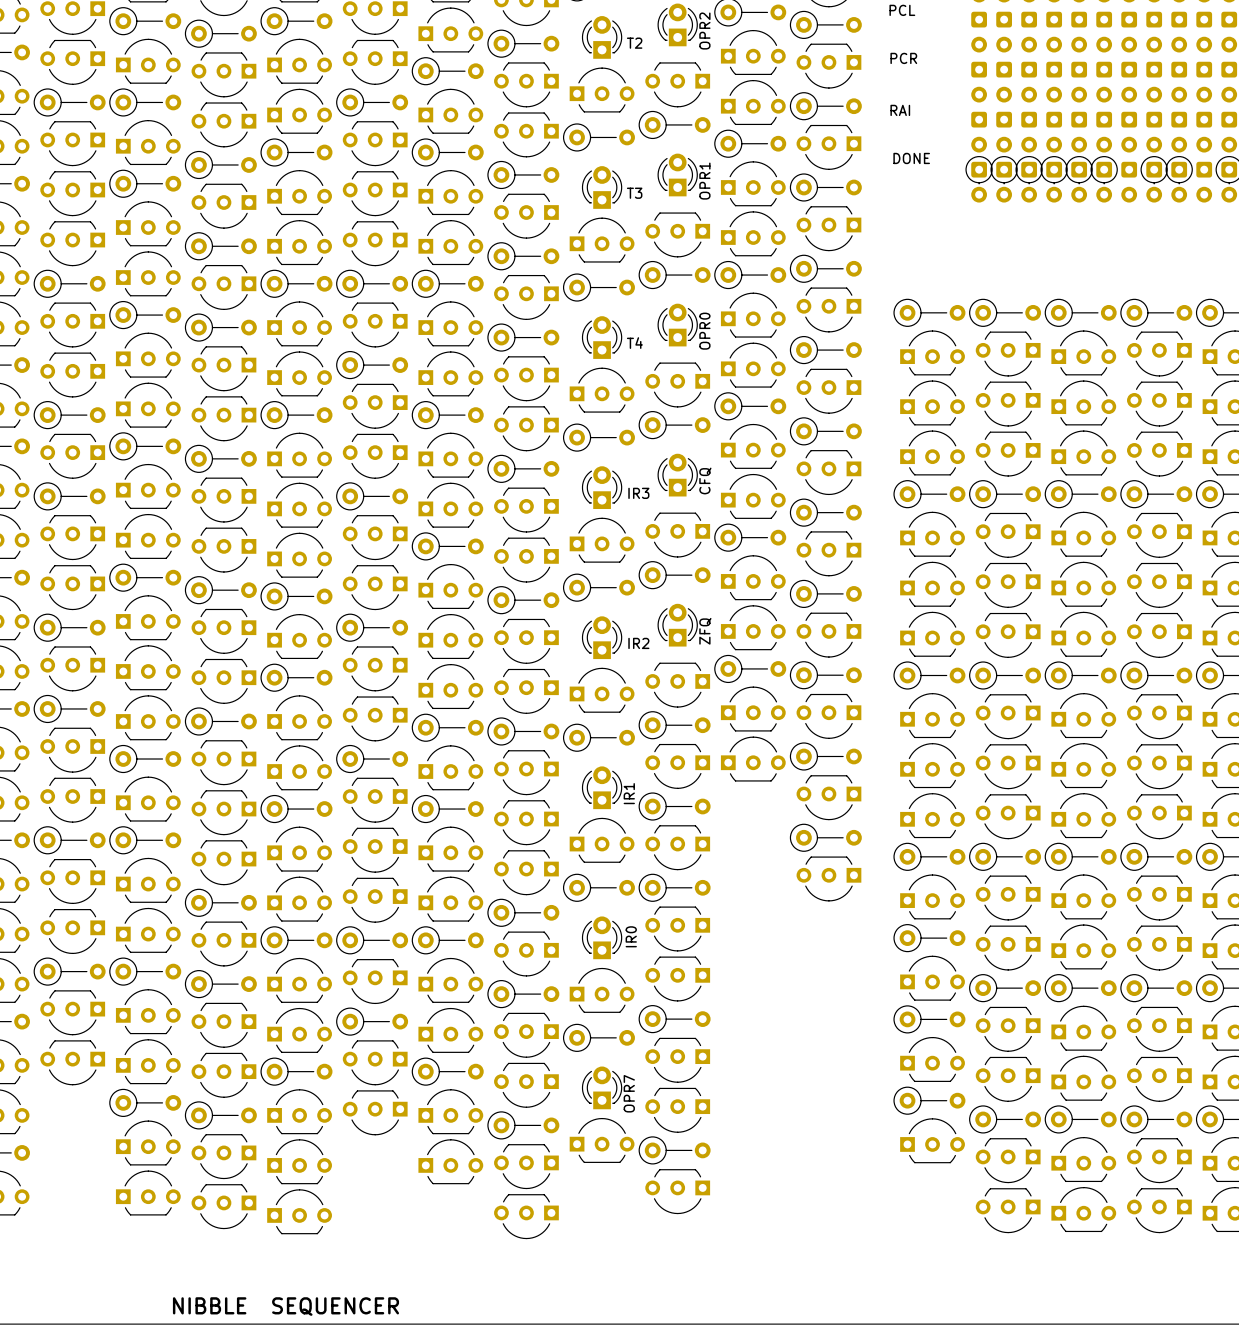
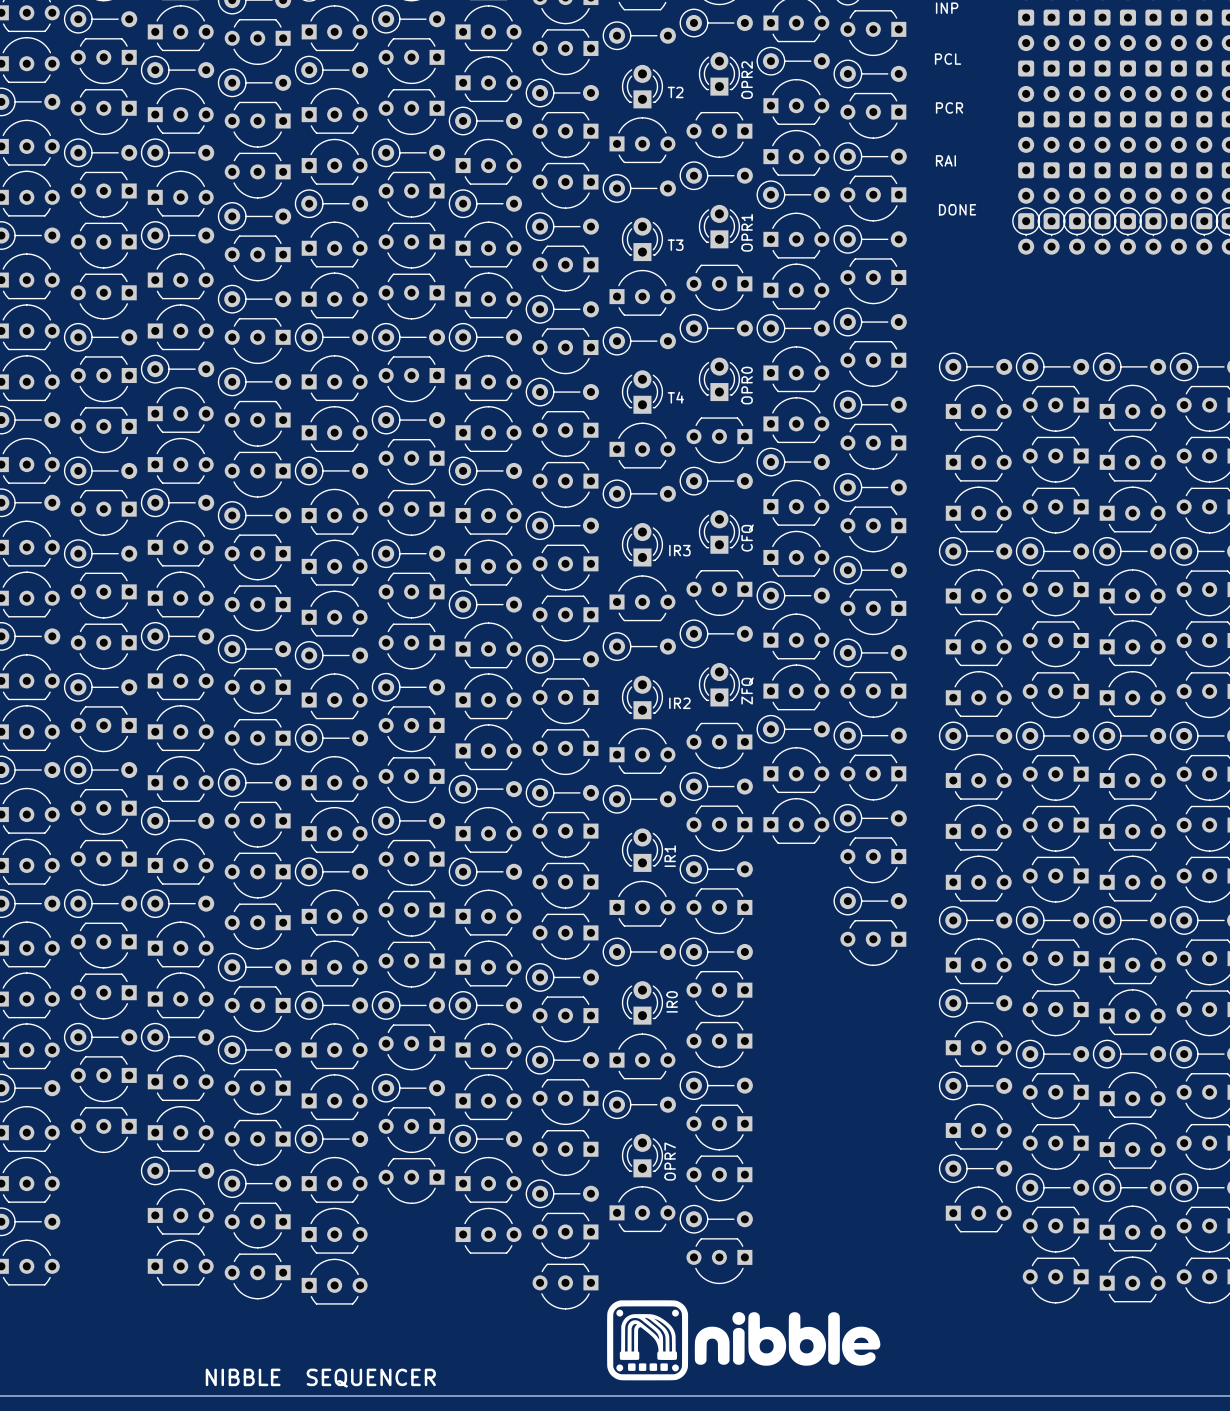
drawing: none -> [607, 1300, 881, 1381]

